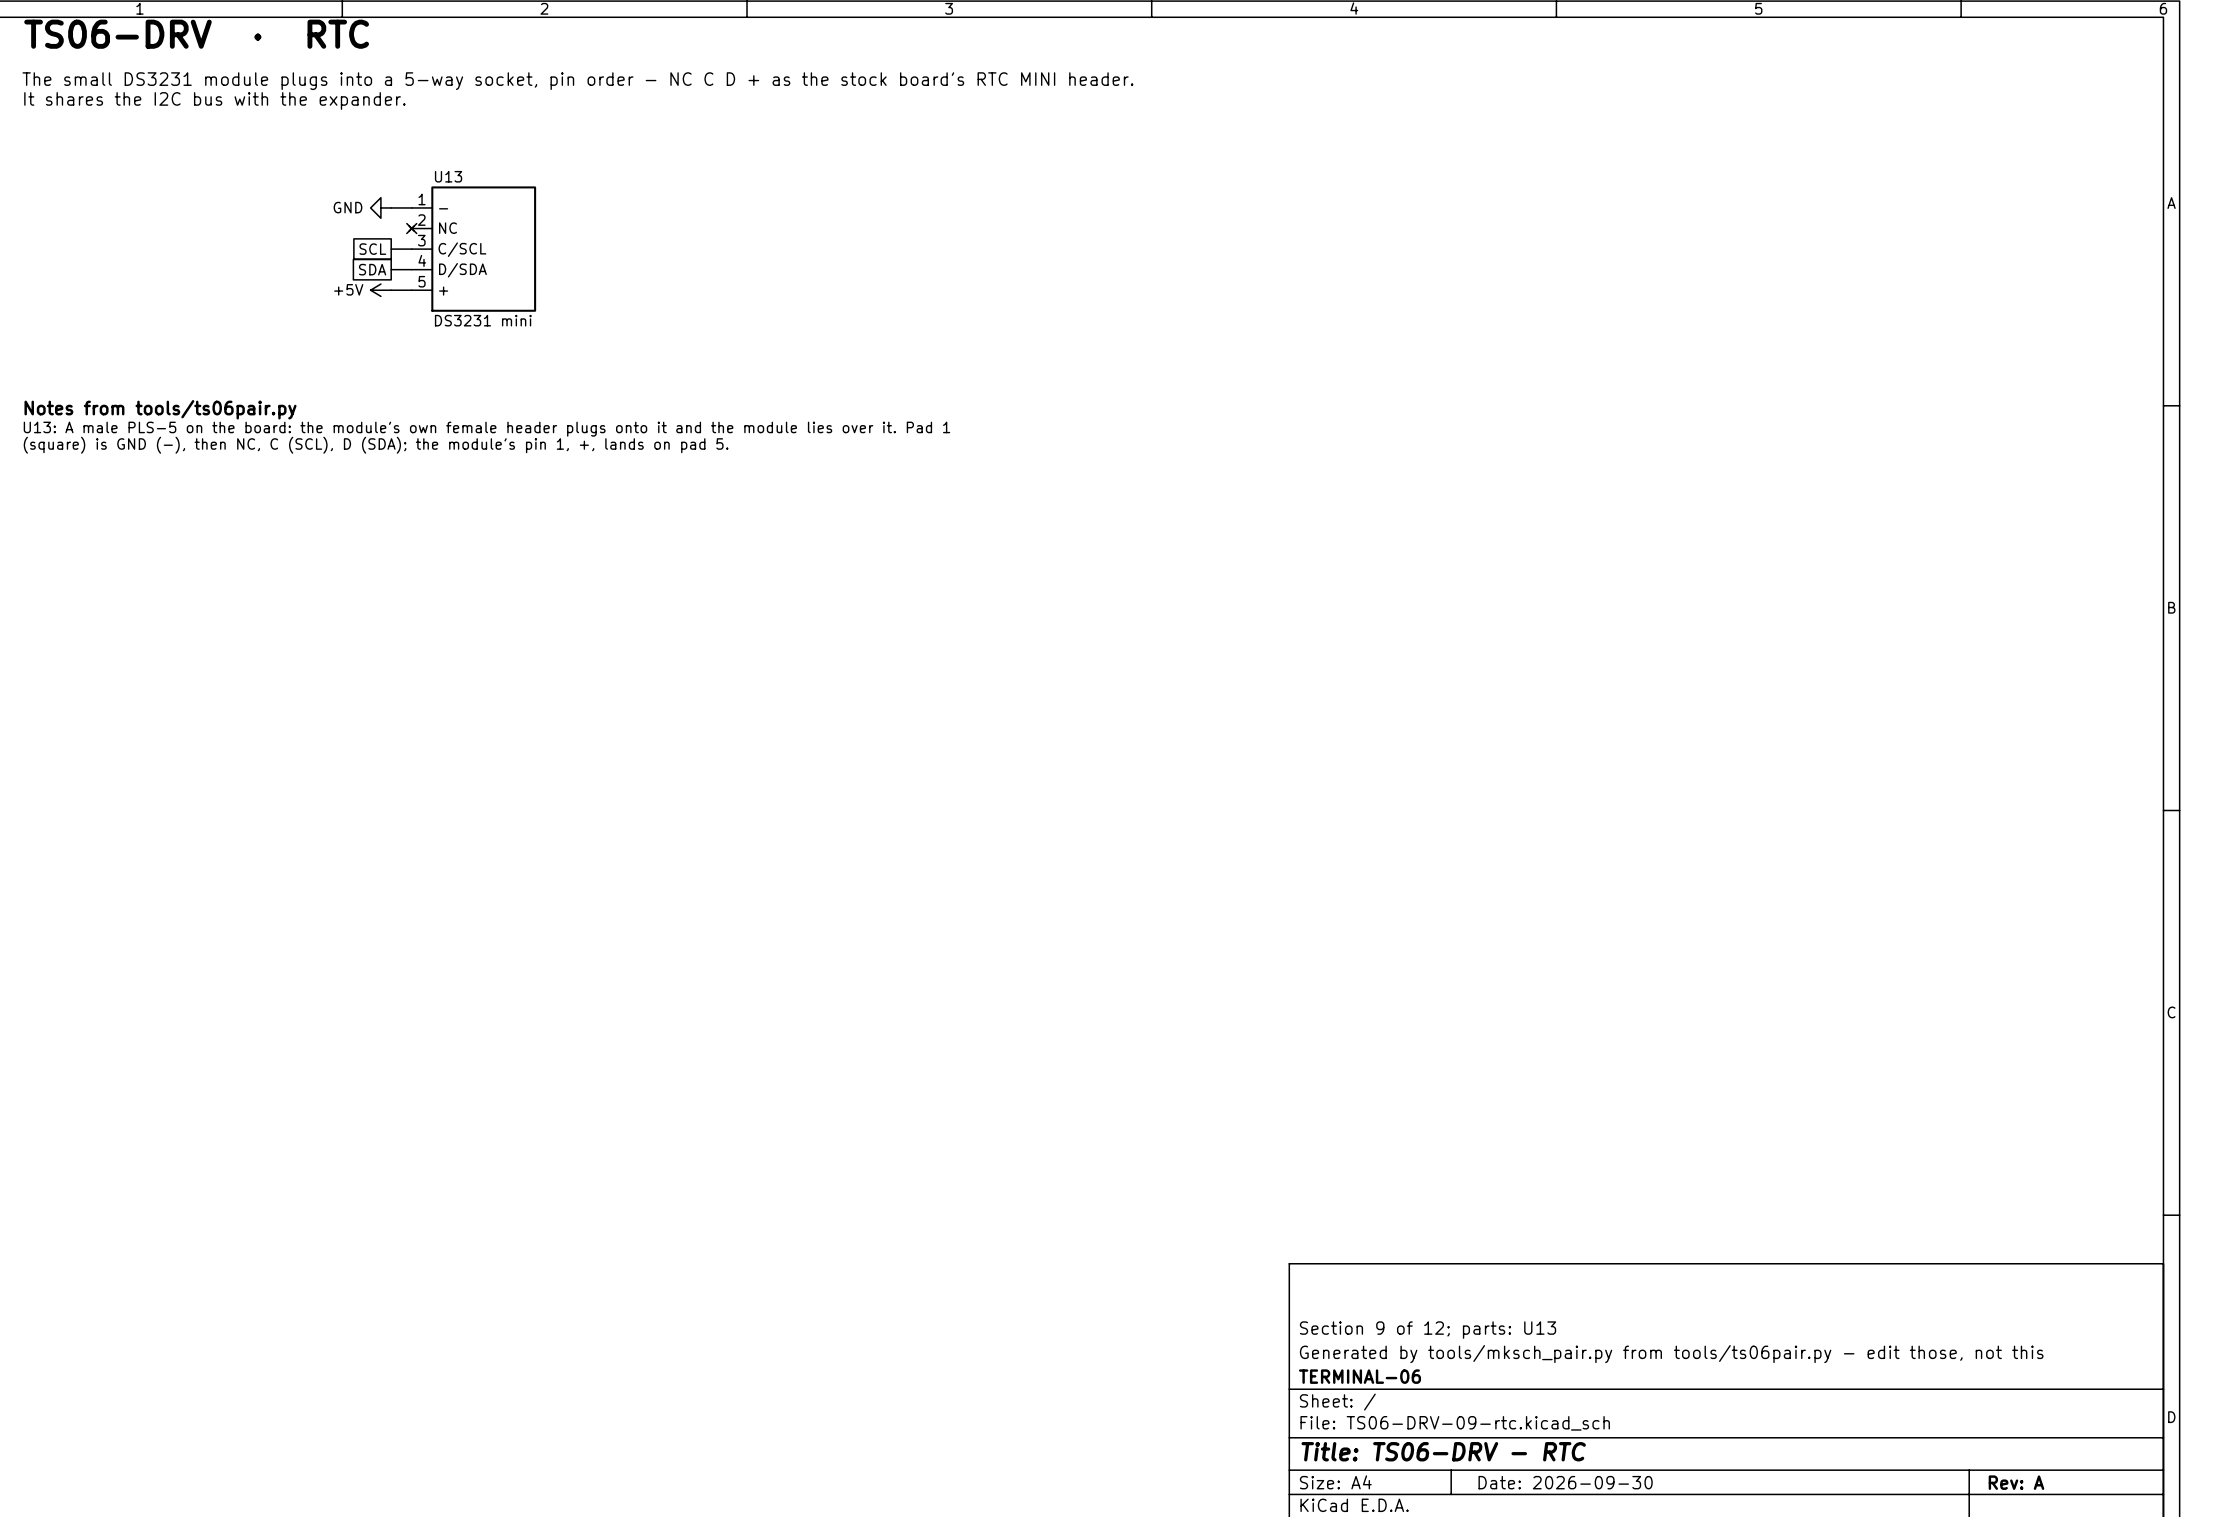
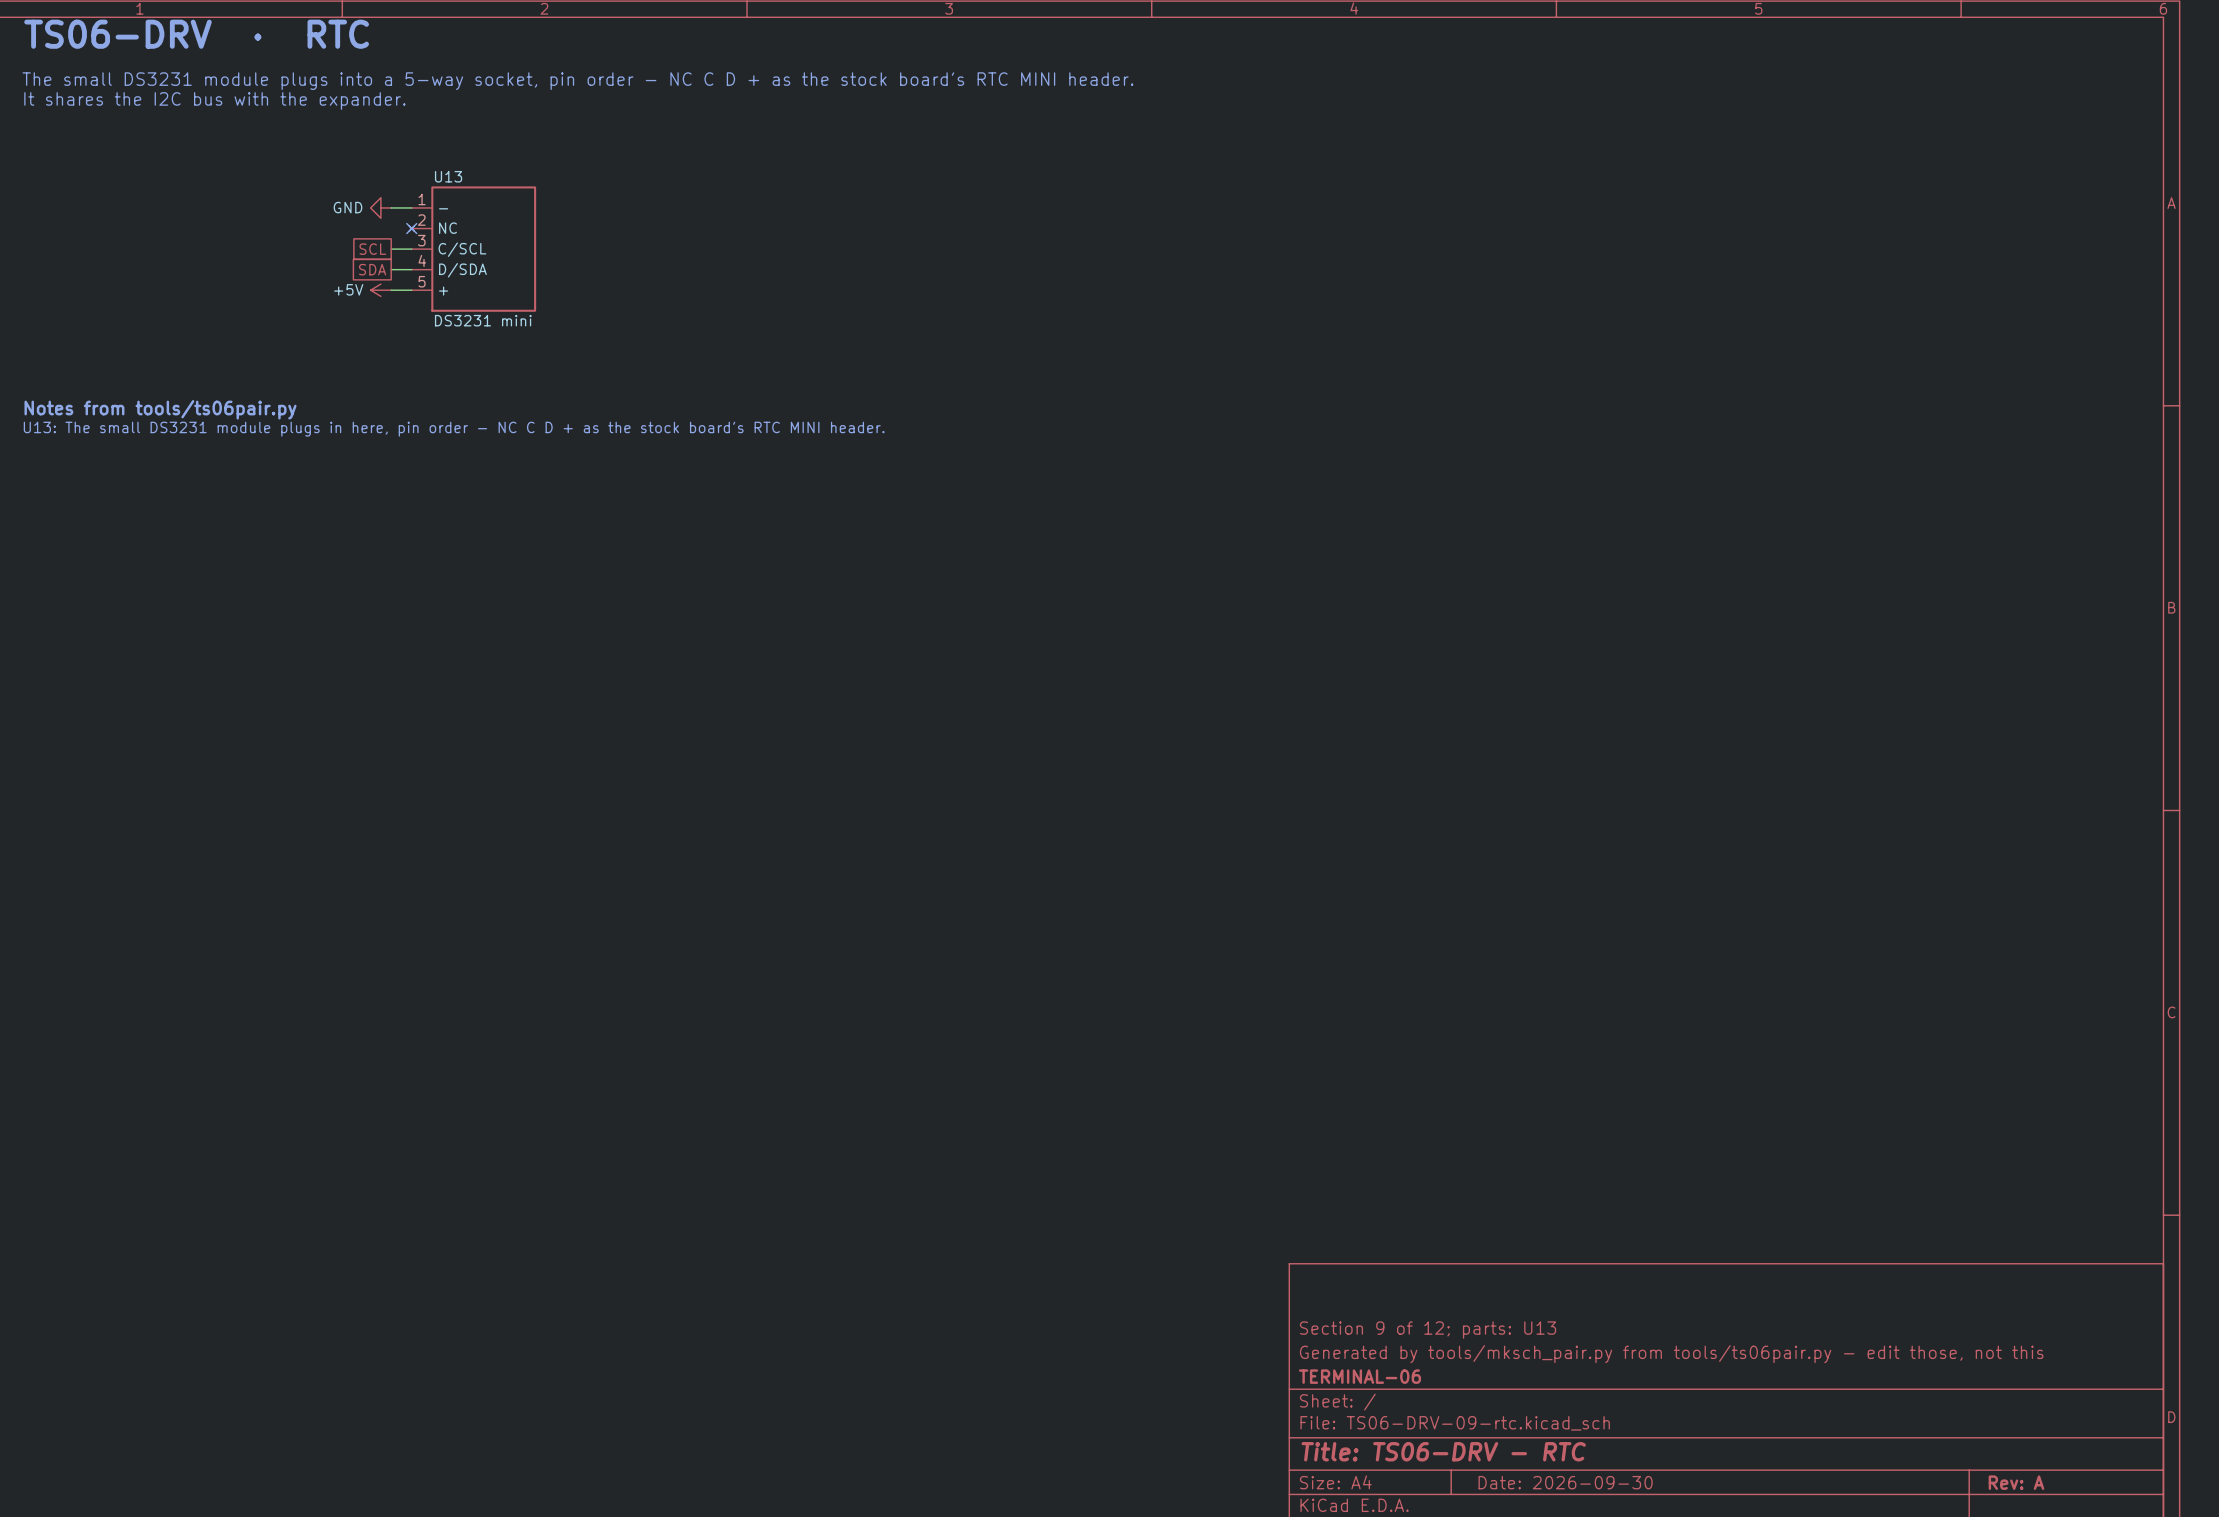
text: U13: A male PLS-5 on the board: the module's own female header plugs onto it and the module lies over it. Pad 1 (486, 429) -> U13: The small DS3231 module plugs in here, pin order - NC C D + as the stock board's RTC MINI header. (454, 429)
text: (square) is GND (-), then NC, C (SCL), D (SDA); the module's pin 1, +, lands on pad 5. (376, 445) -> none

